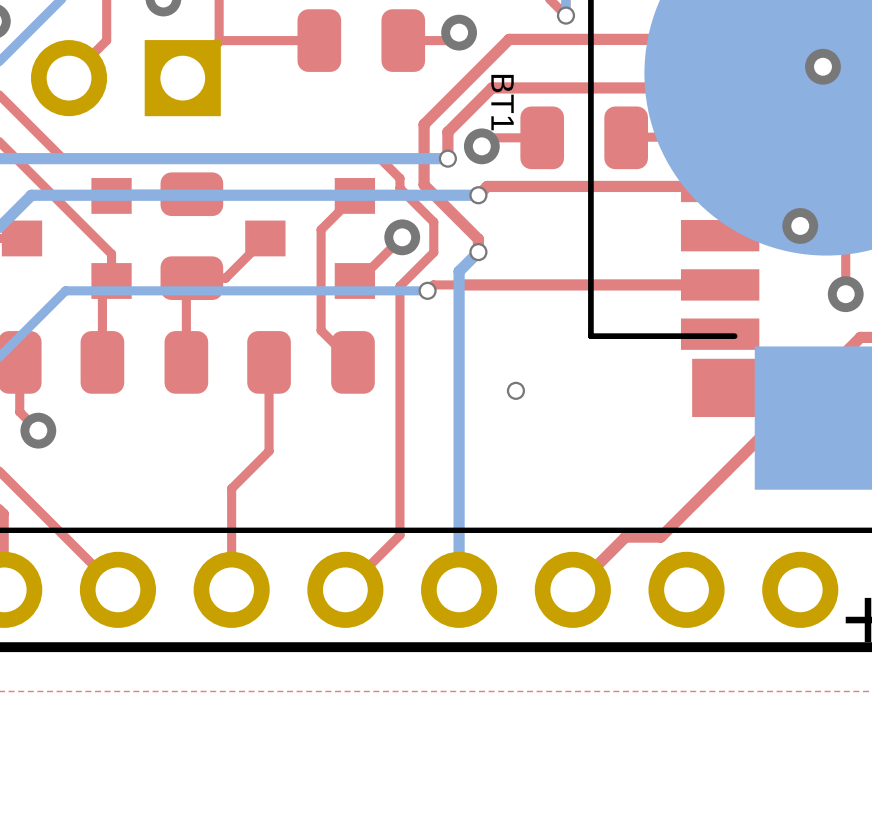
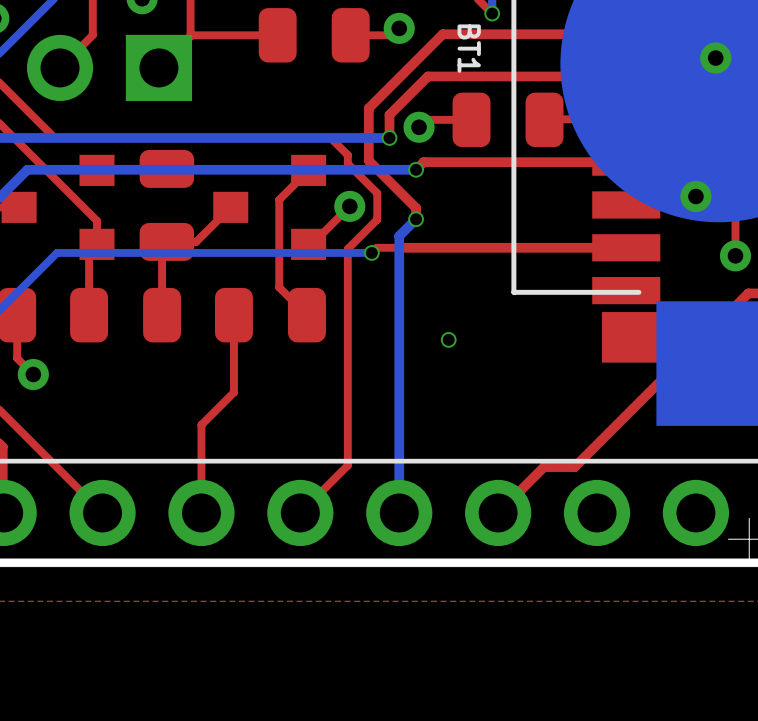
BT1 name position: BT1 (502, 102) -> BT1 (469, 48)

